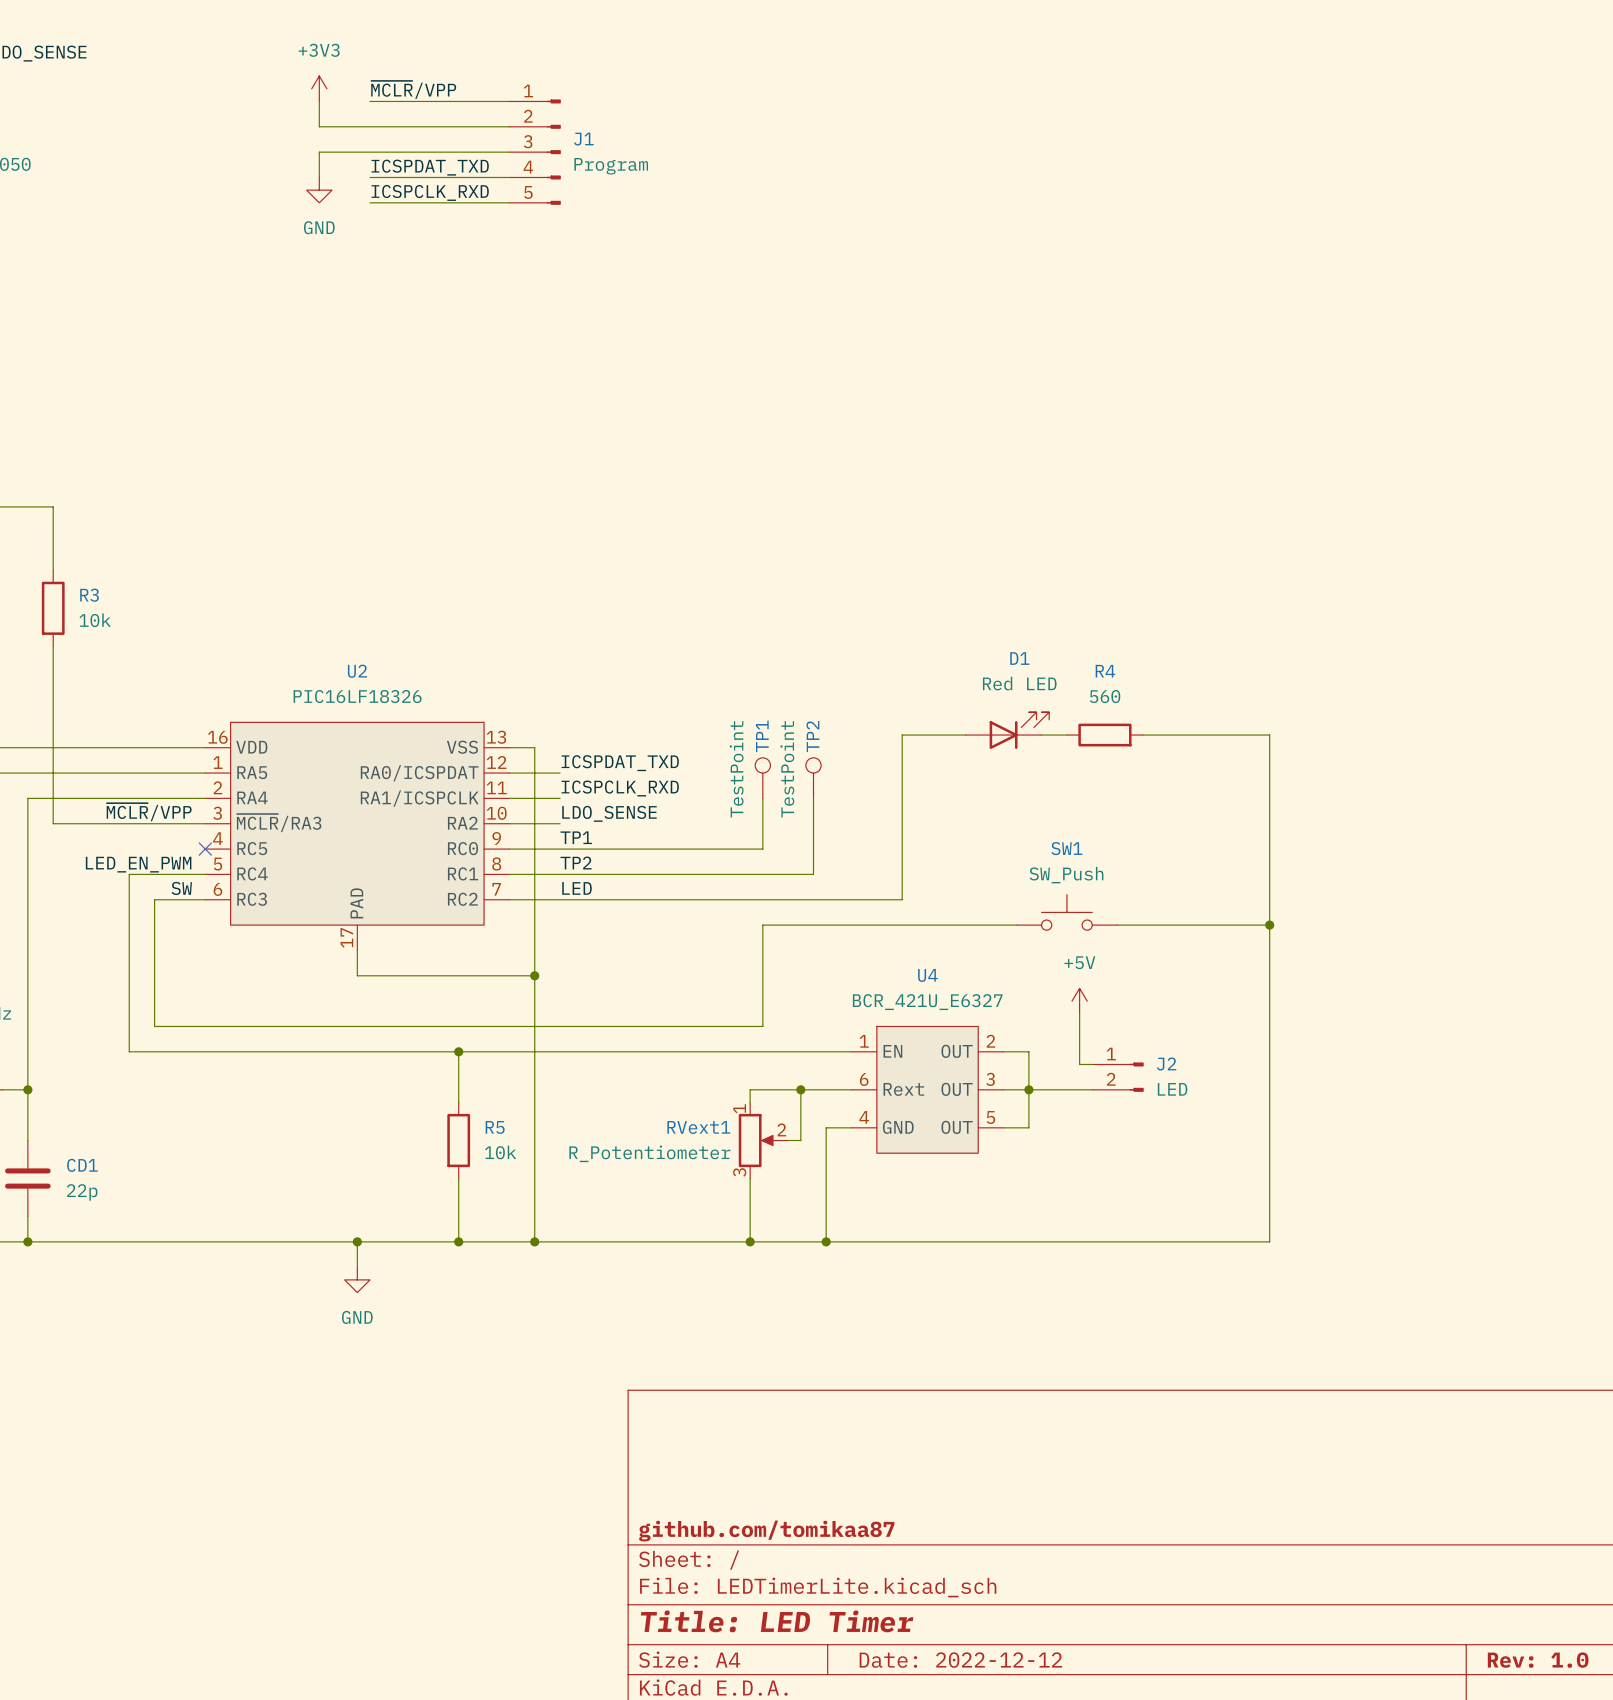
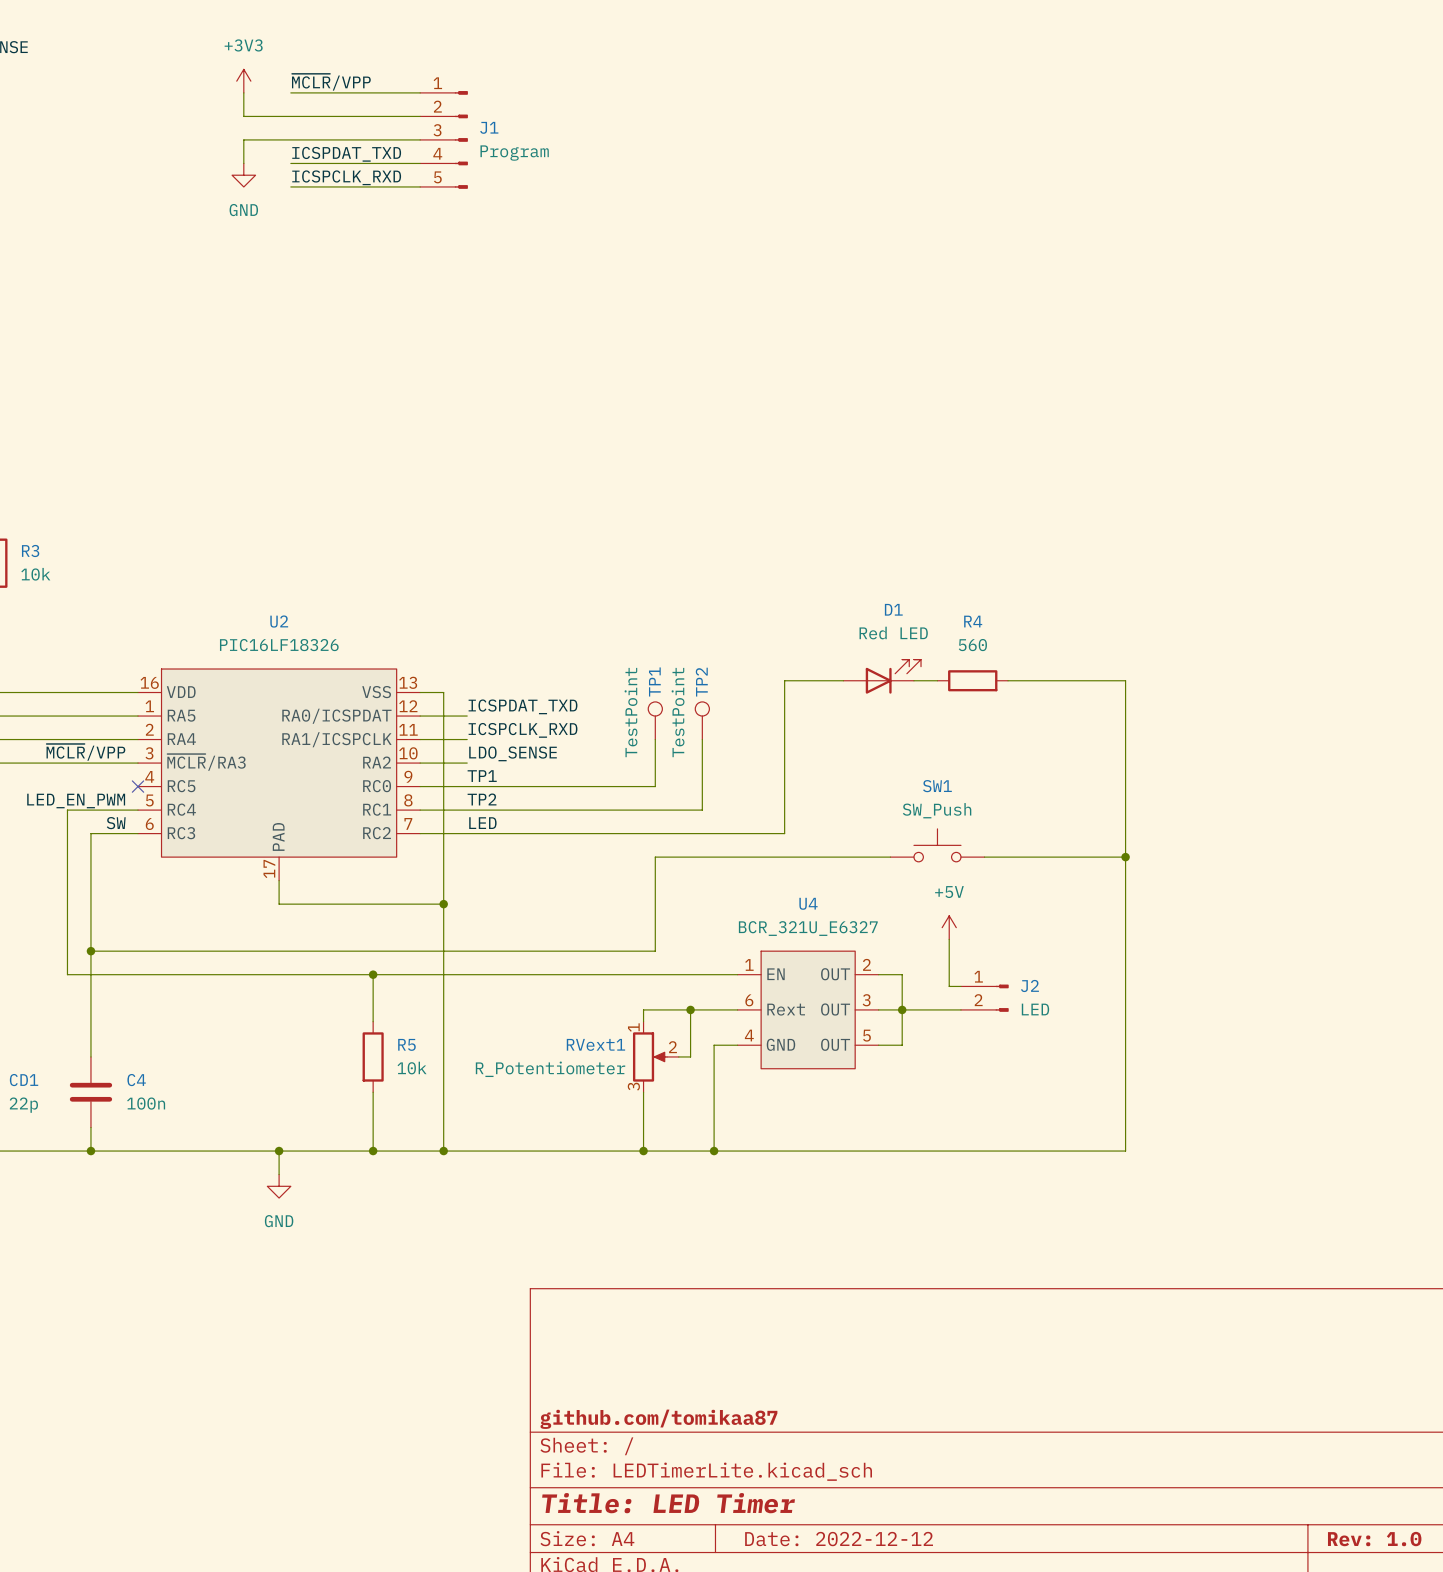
U4 value: BCR_421U_E6327 (927, 1002) -> BCR_321U_E6327 (808, 928)
wire: none -> (90, 951) (90, 1056)
junction: none -> (90, 951)
C4: none -> 100n (90, 1092)
wire: none -> (90, 1127) (90, 1151)
junction: none -> (90, 1151)

